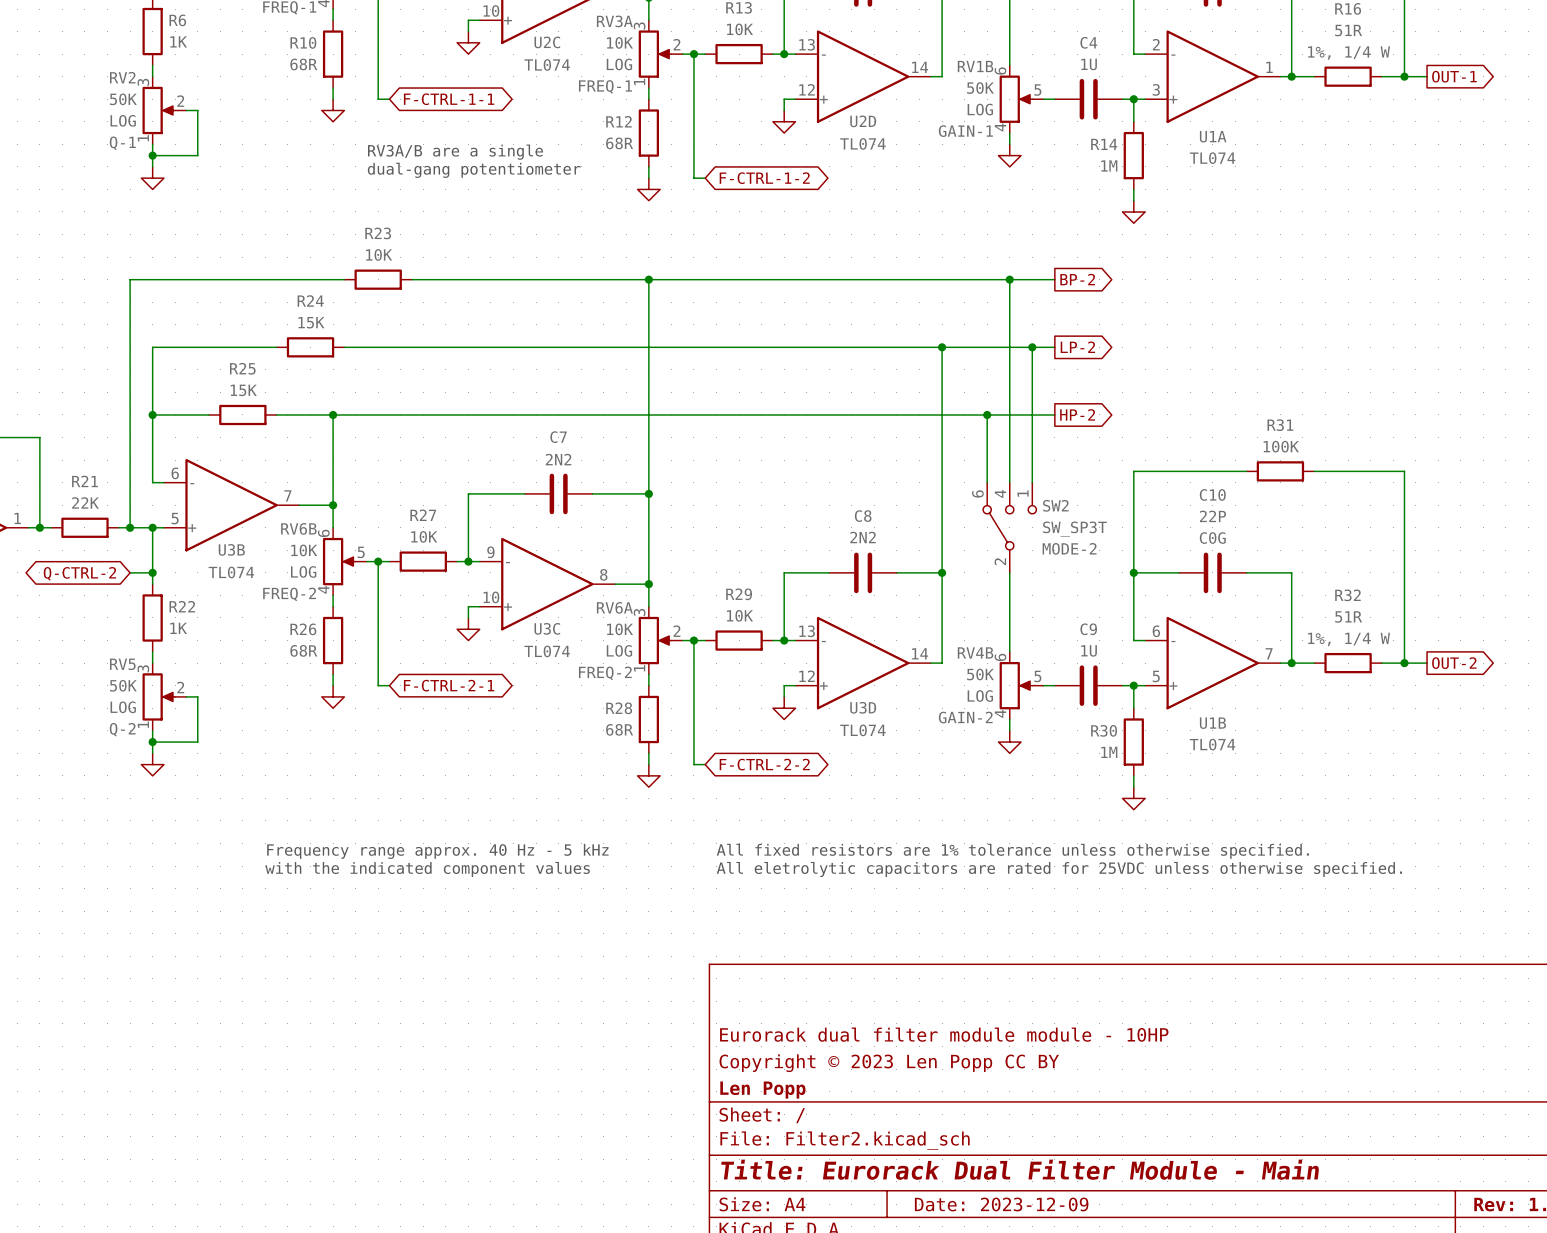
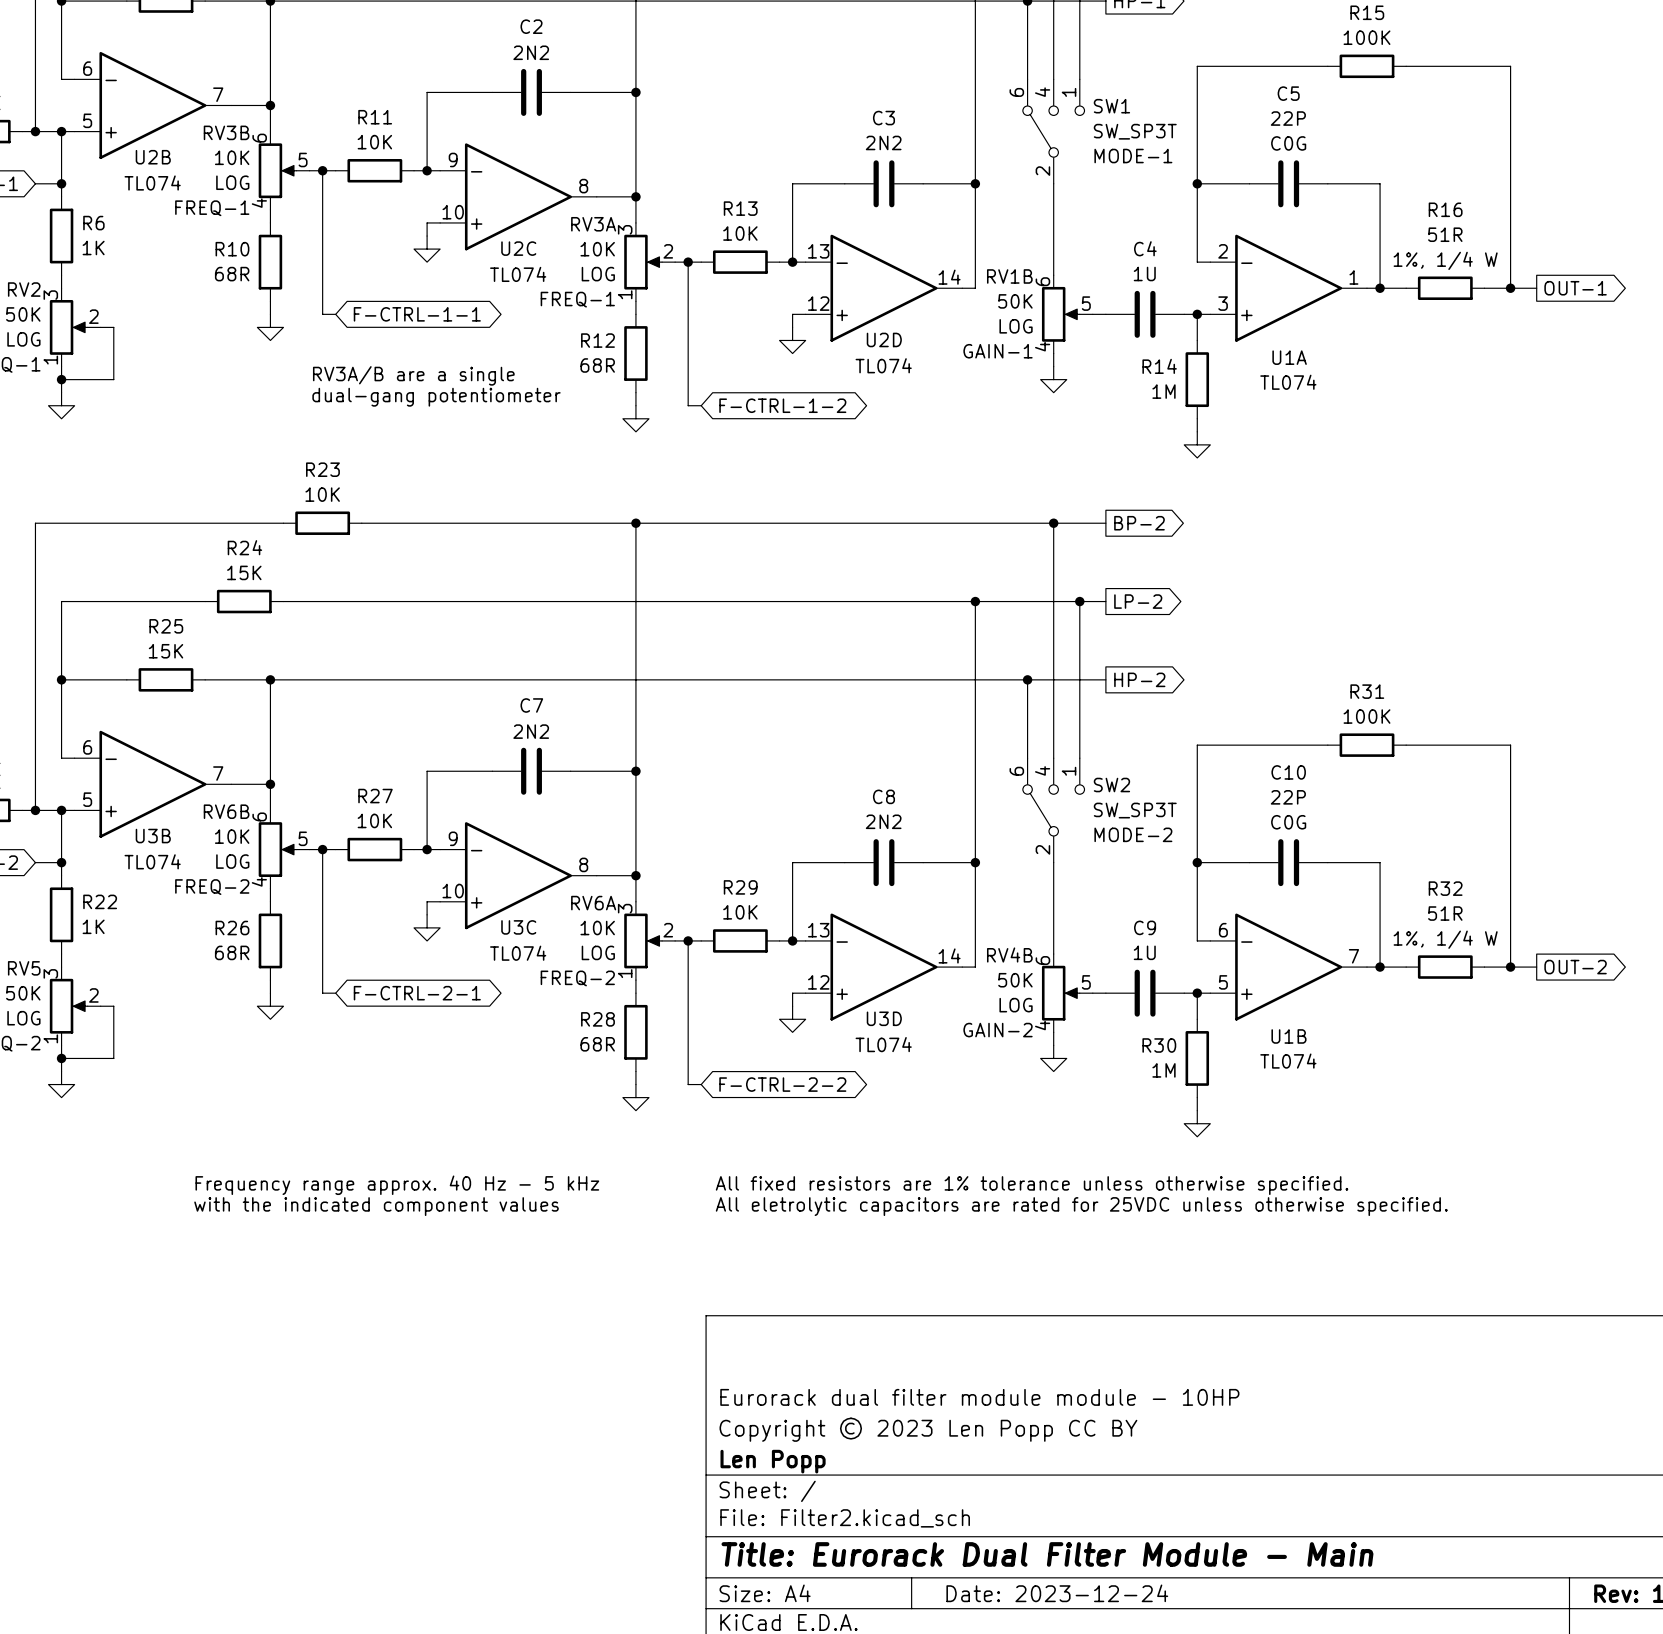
title block: Date: 2023-12-09 (1001, 1204) -> Date: 2023-12-24 (1057, 1593)

